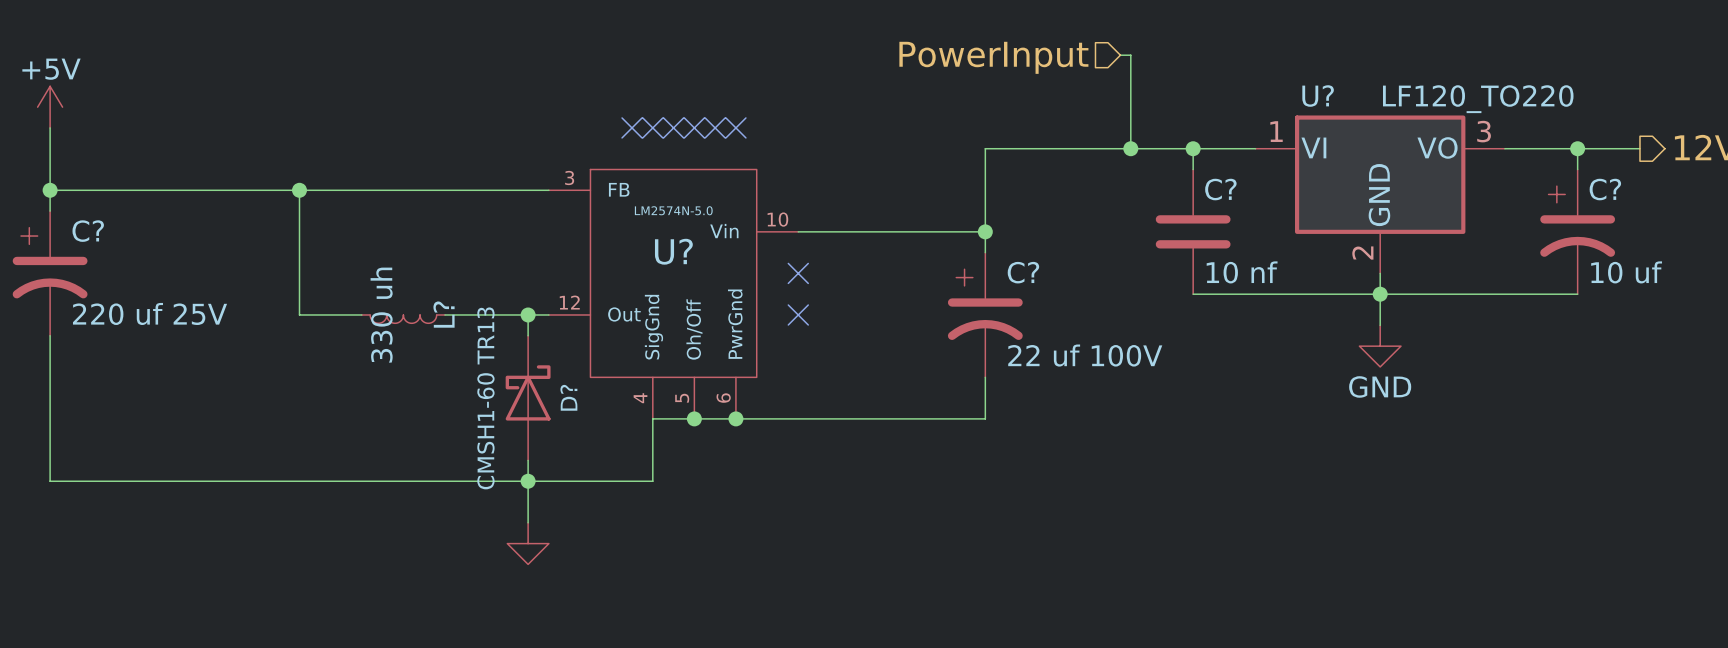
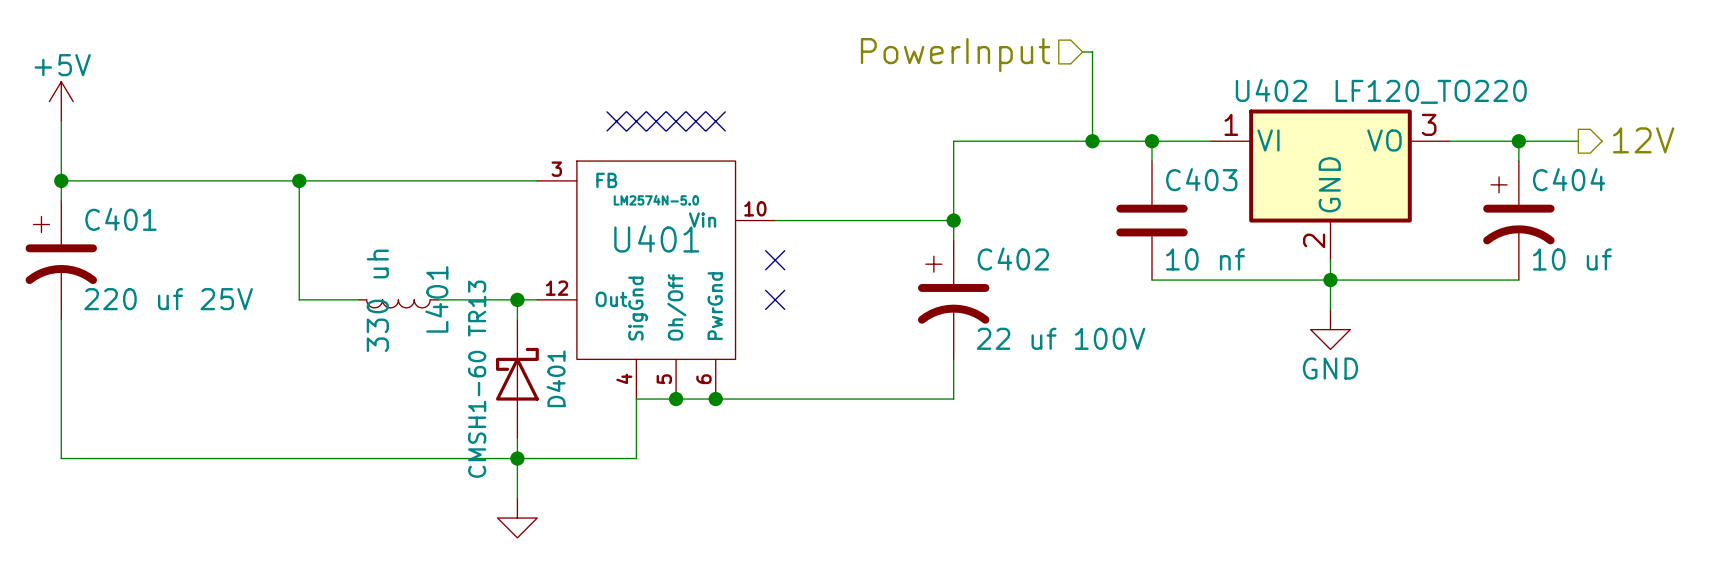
U? name: U? (1318, 96) -> U402 (1271, 90)
C? name: C? (1220, 189) -> C403 (1201, 179)
C? name: C? (1605, 189) -> C404 (1569, 179)
C? name: C? (88, 231) -> C401 (120, 219)
U? name: U? (673, 251) -> U401 (656, 238)
C? name: C? (1023, 272) -> C402 (1013, 259)
L? name: L? (444, 314) -> L401 (436, 299)
D? name: D? (568, 397) -> D401 (556, 378)

